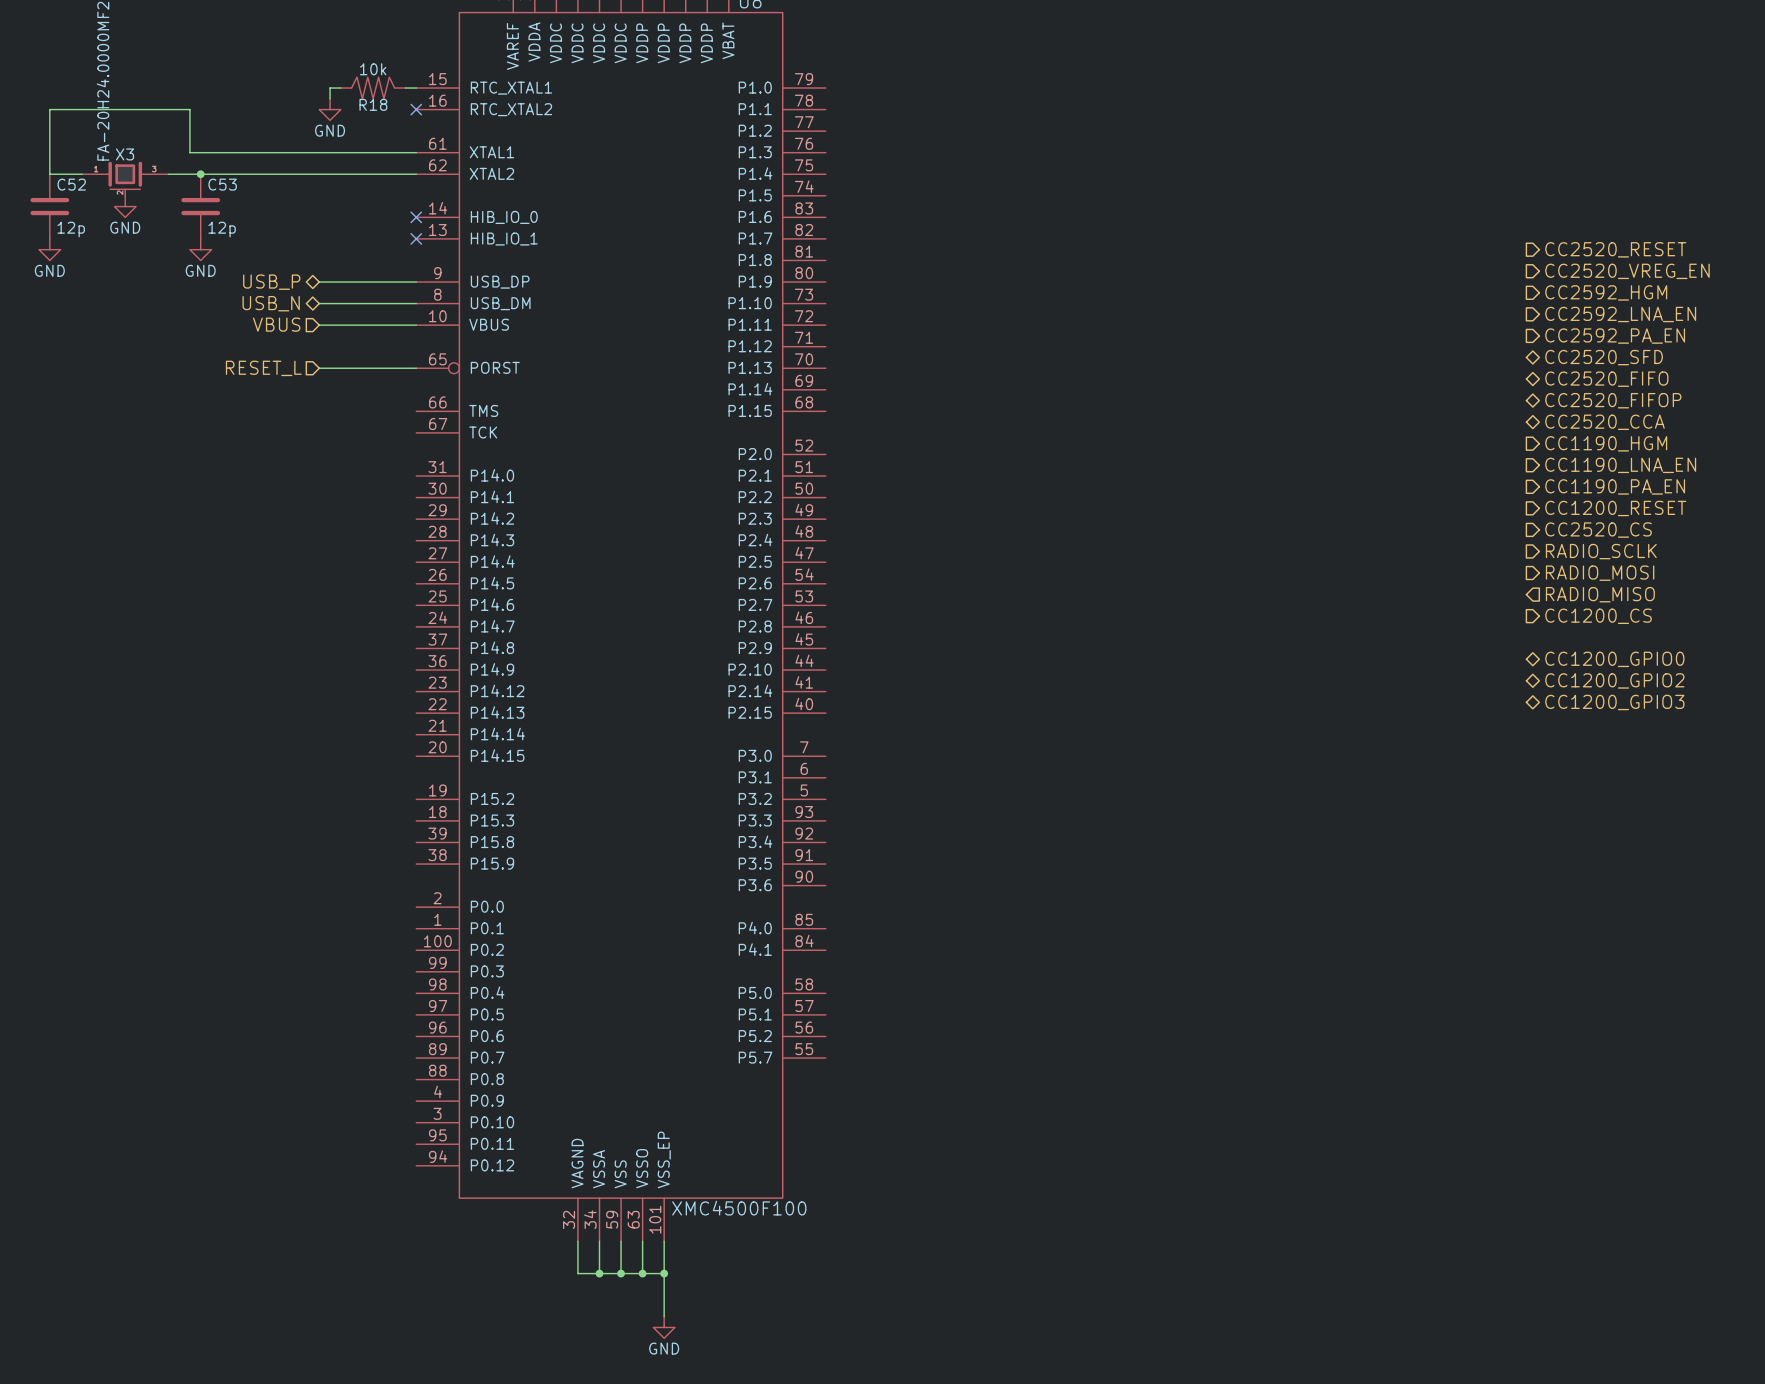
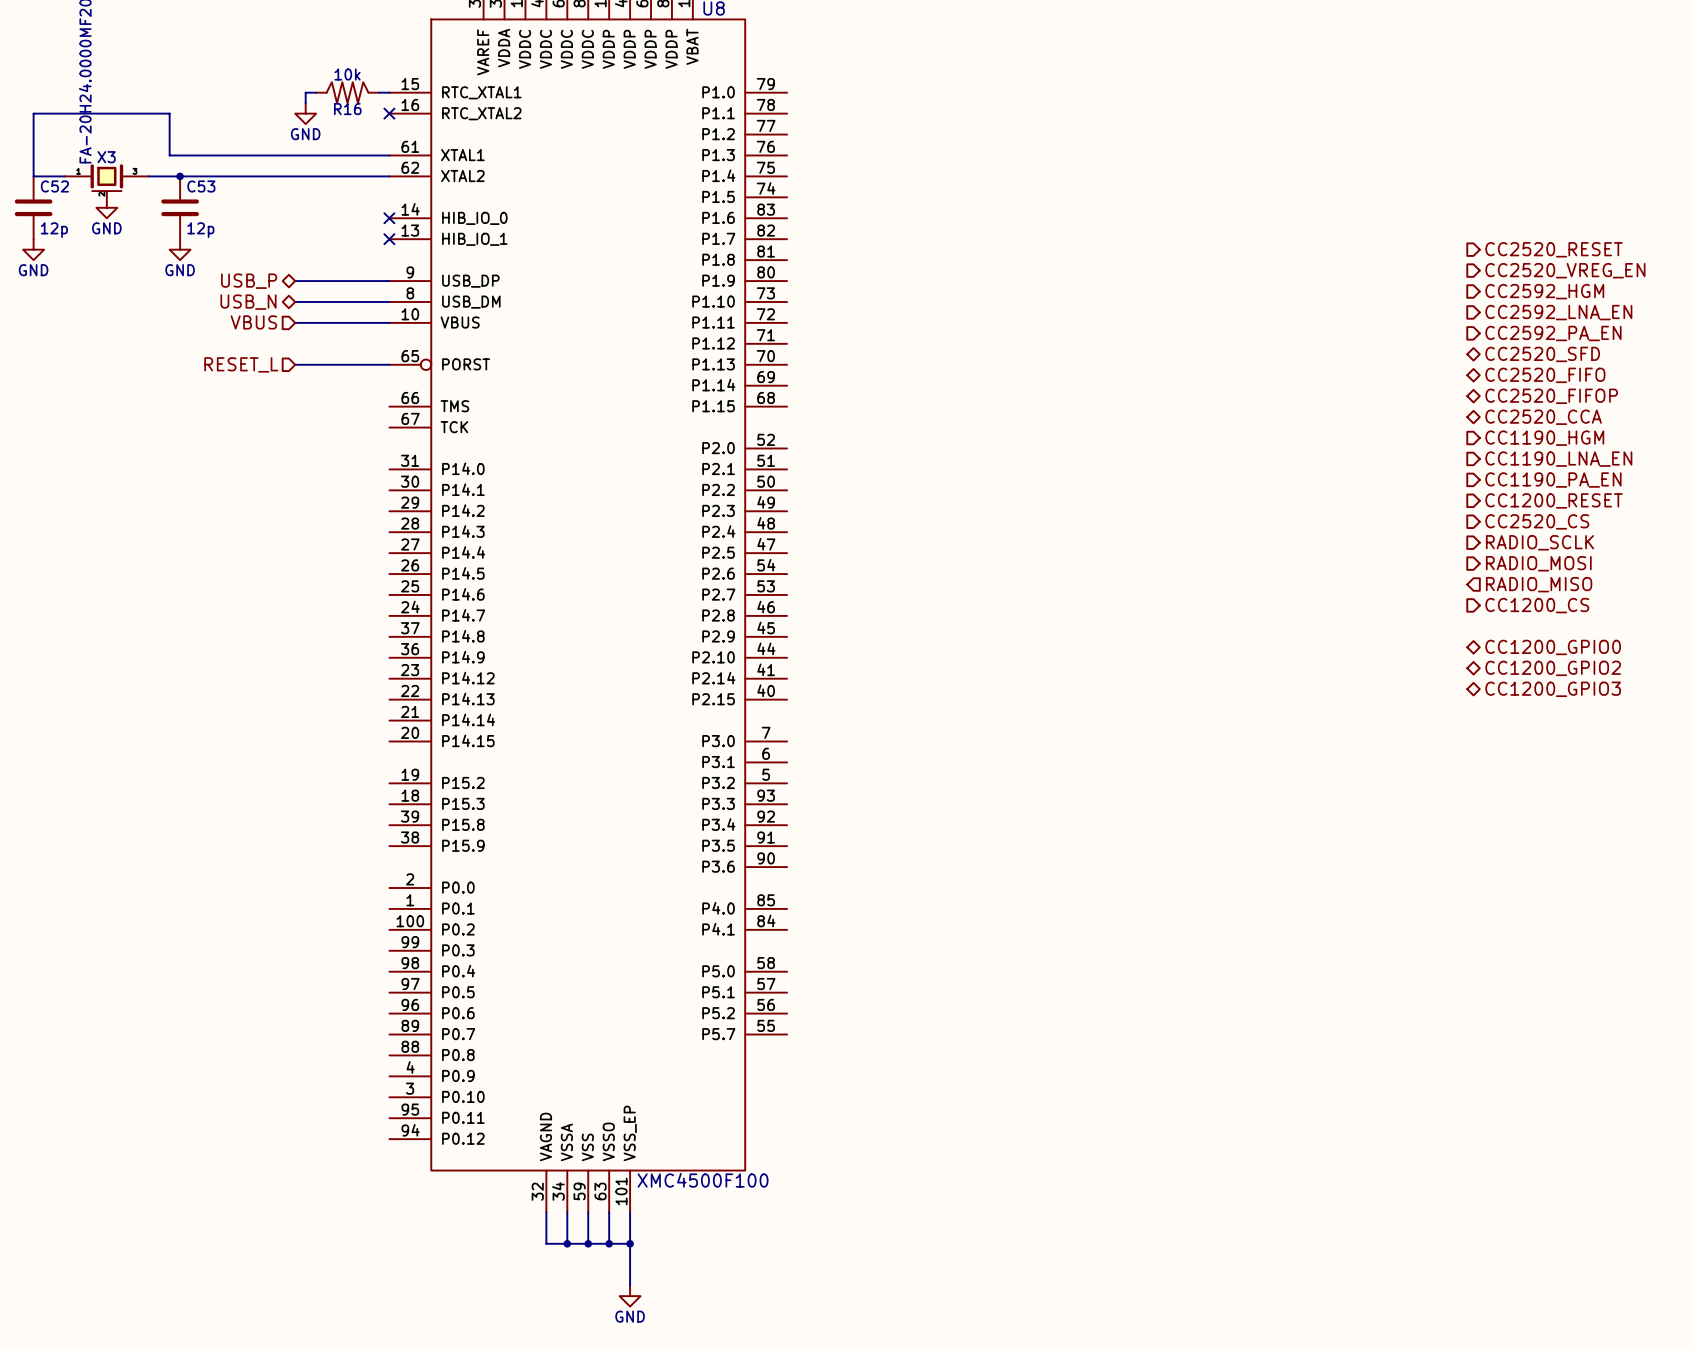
R18 name: R18 (373, 104) -> R16 (347, 109)

